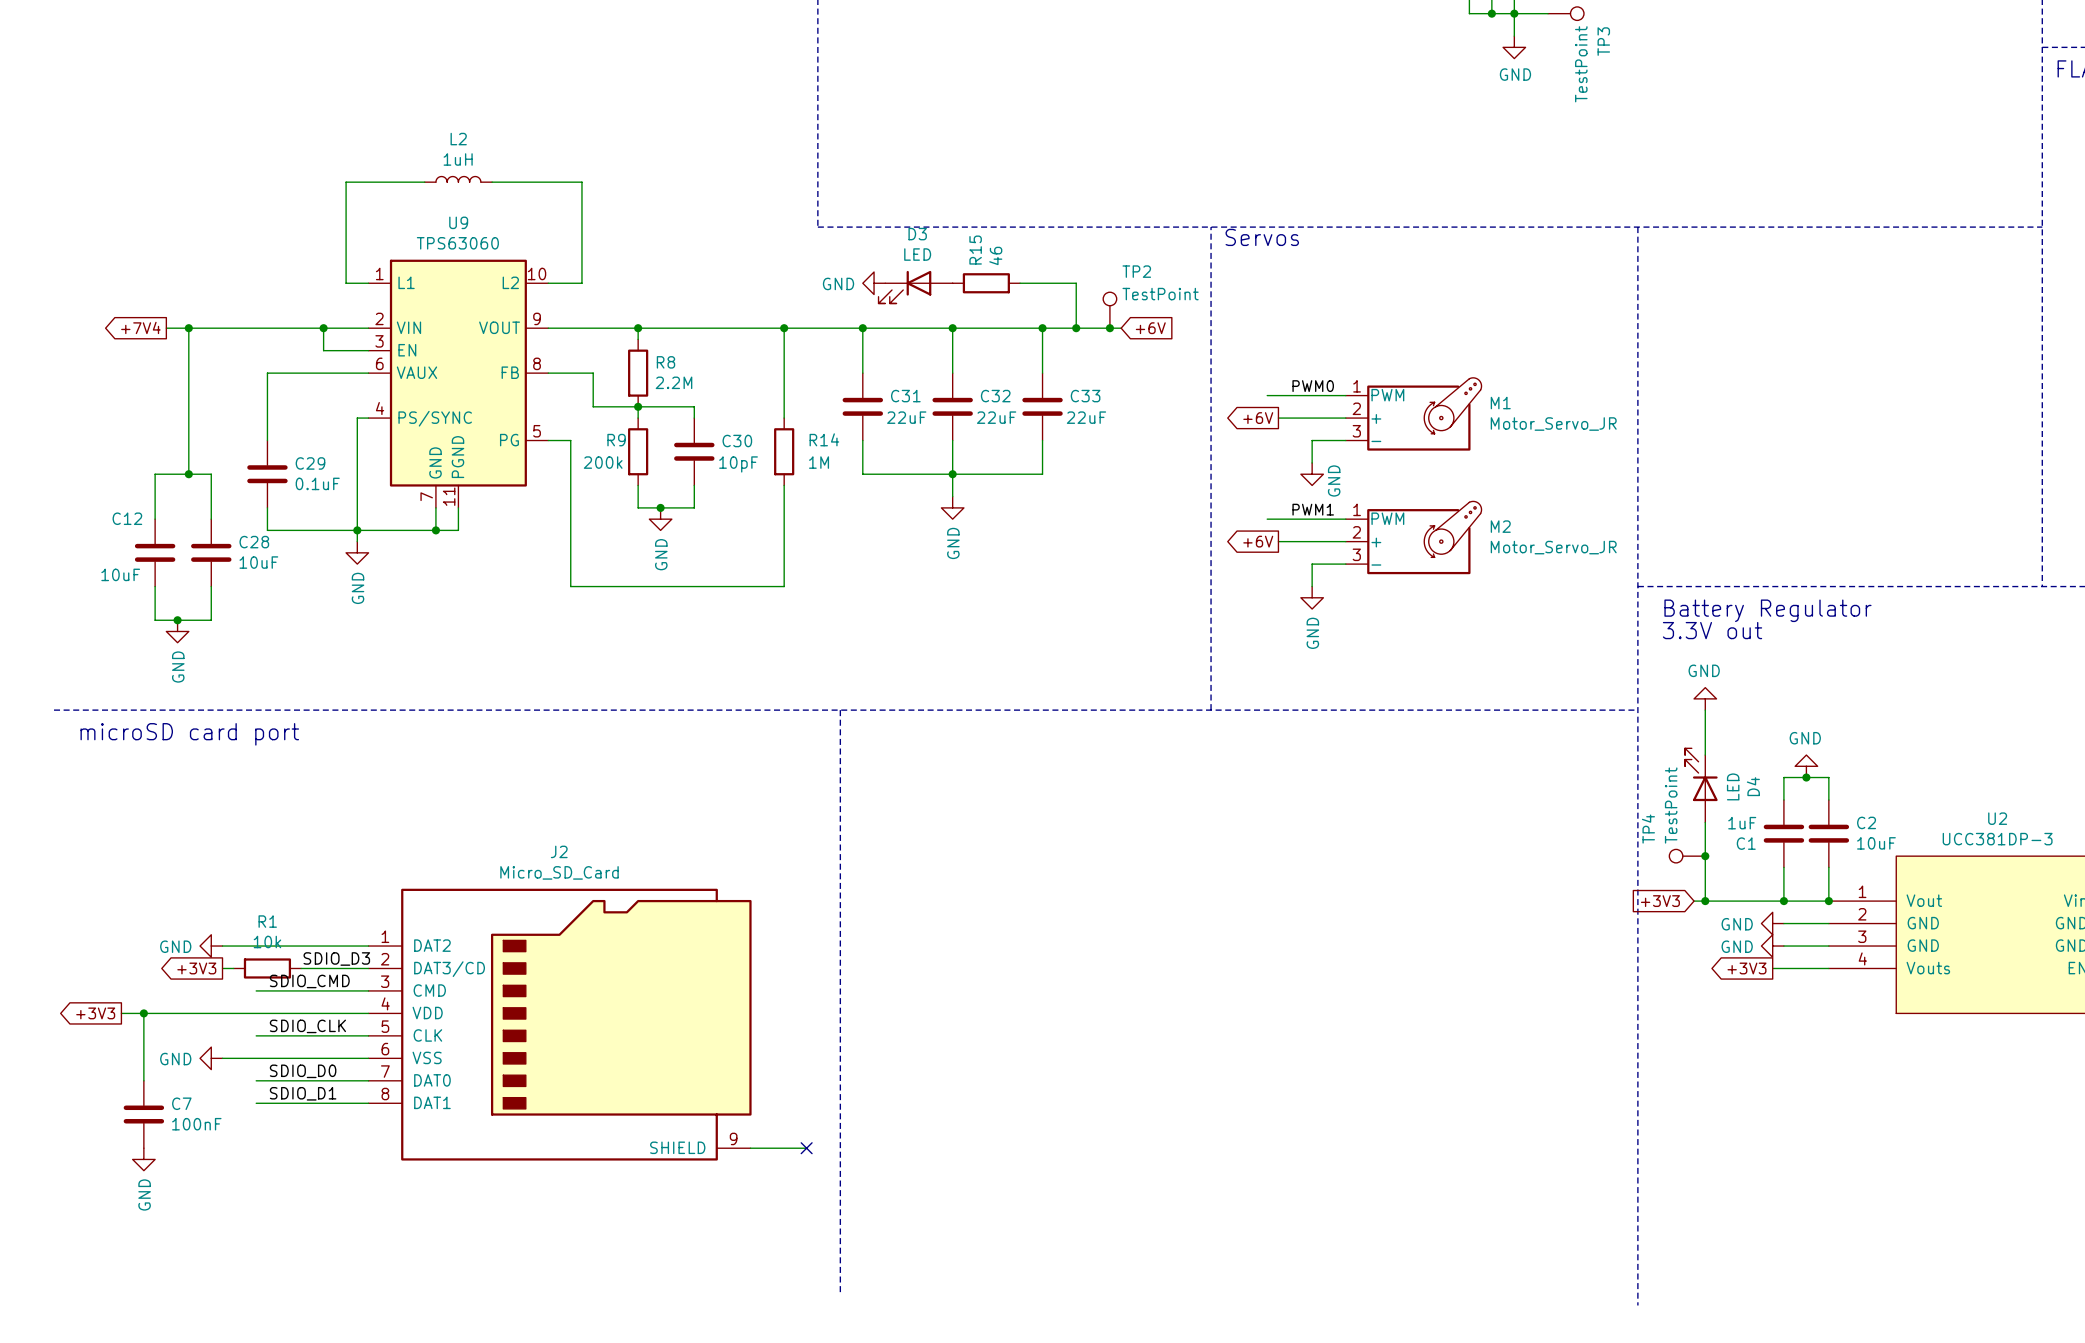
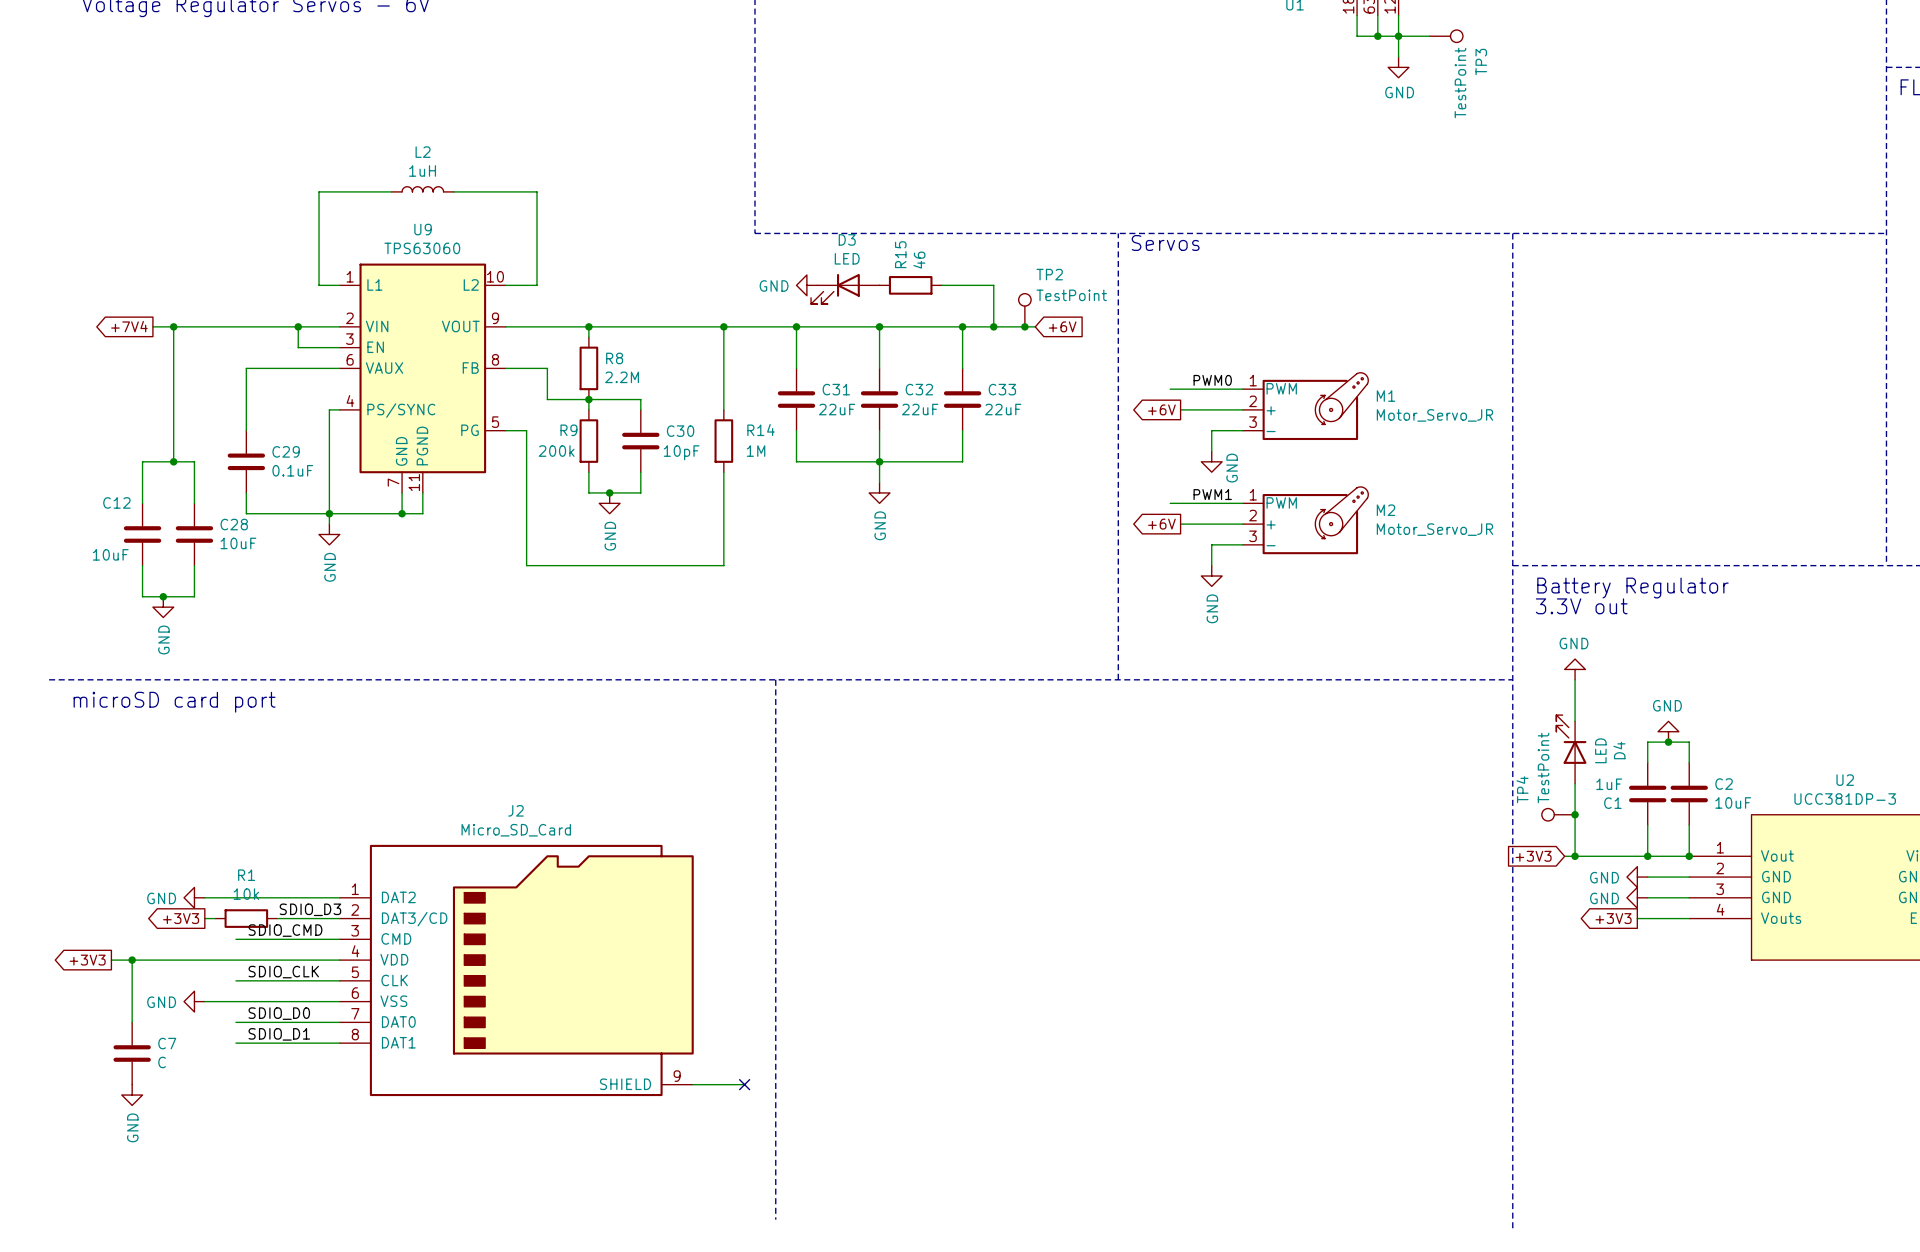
C7 value: 100nF (196, 1124) -> C (162, 1062)

